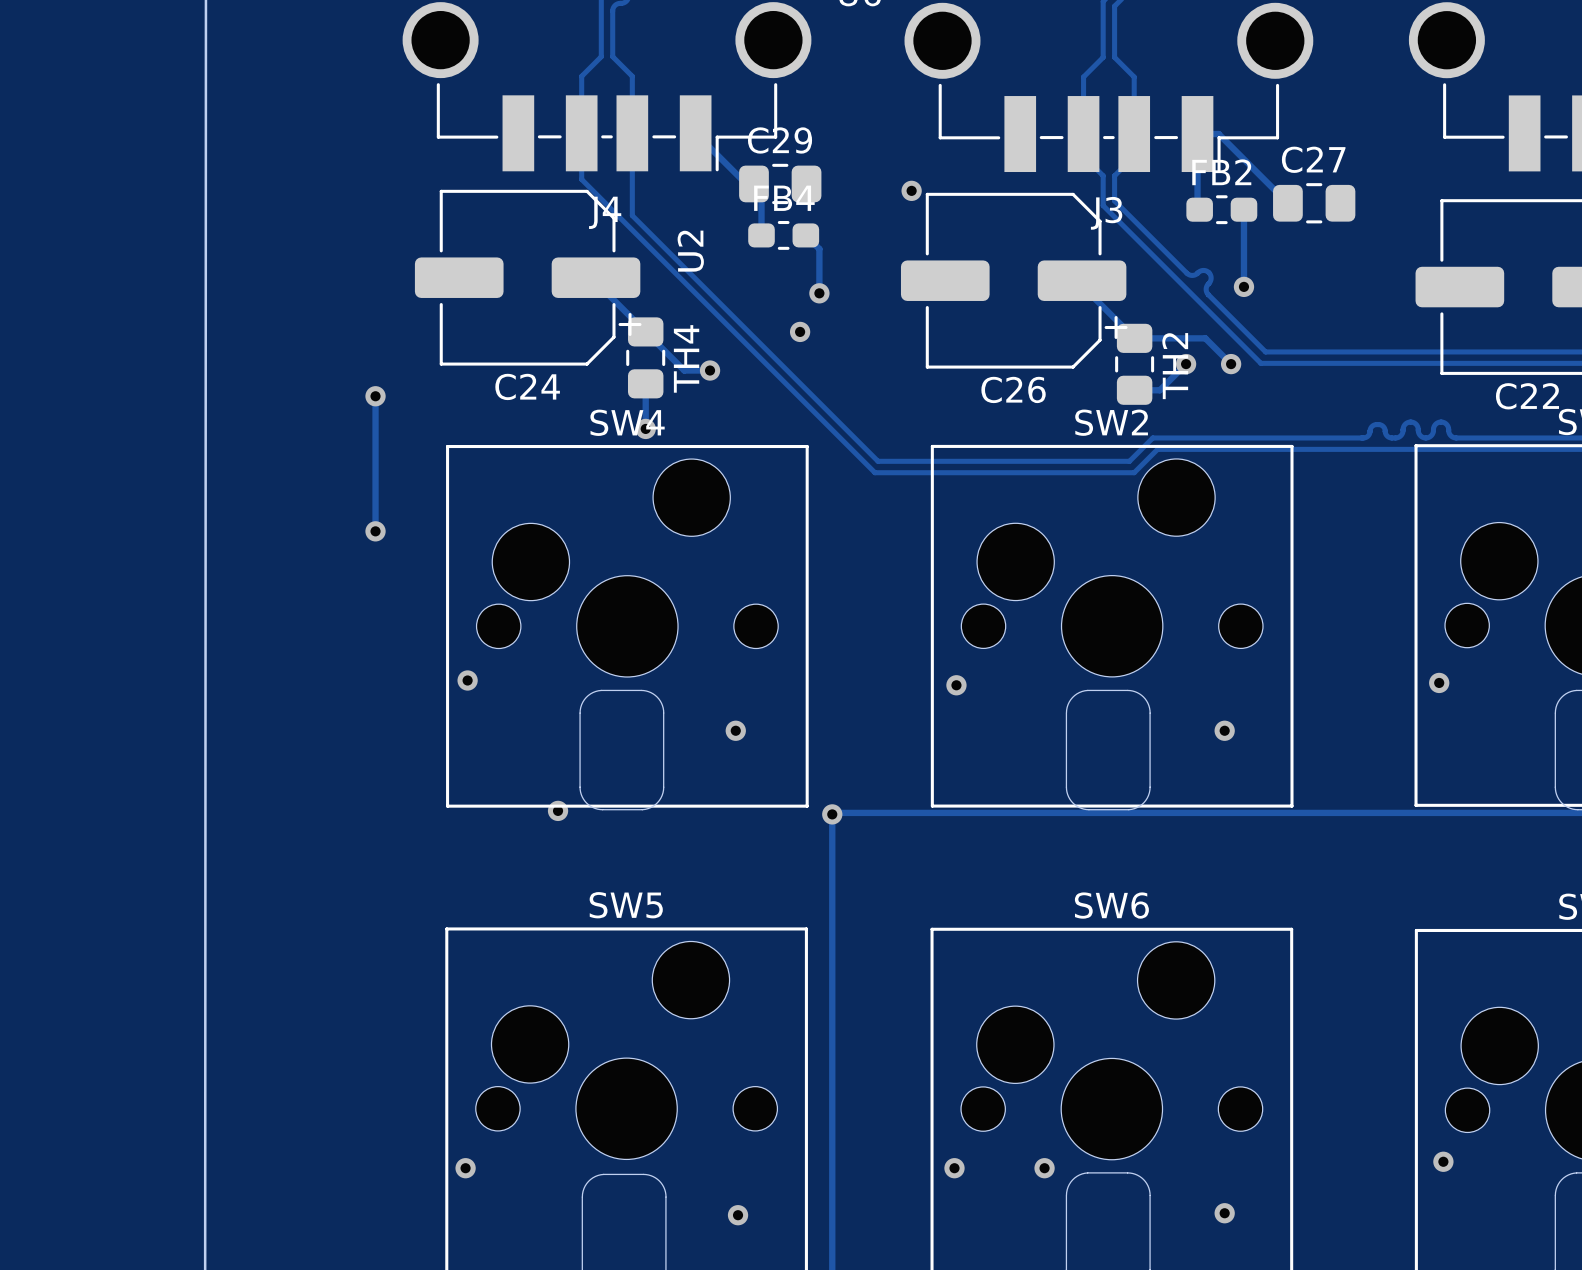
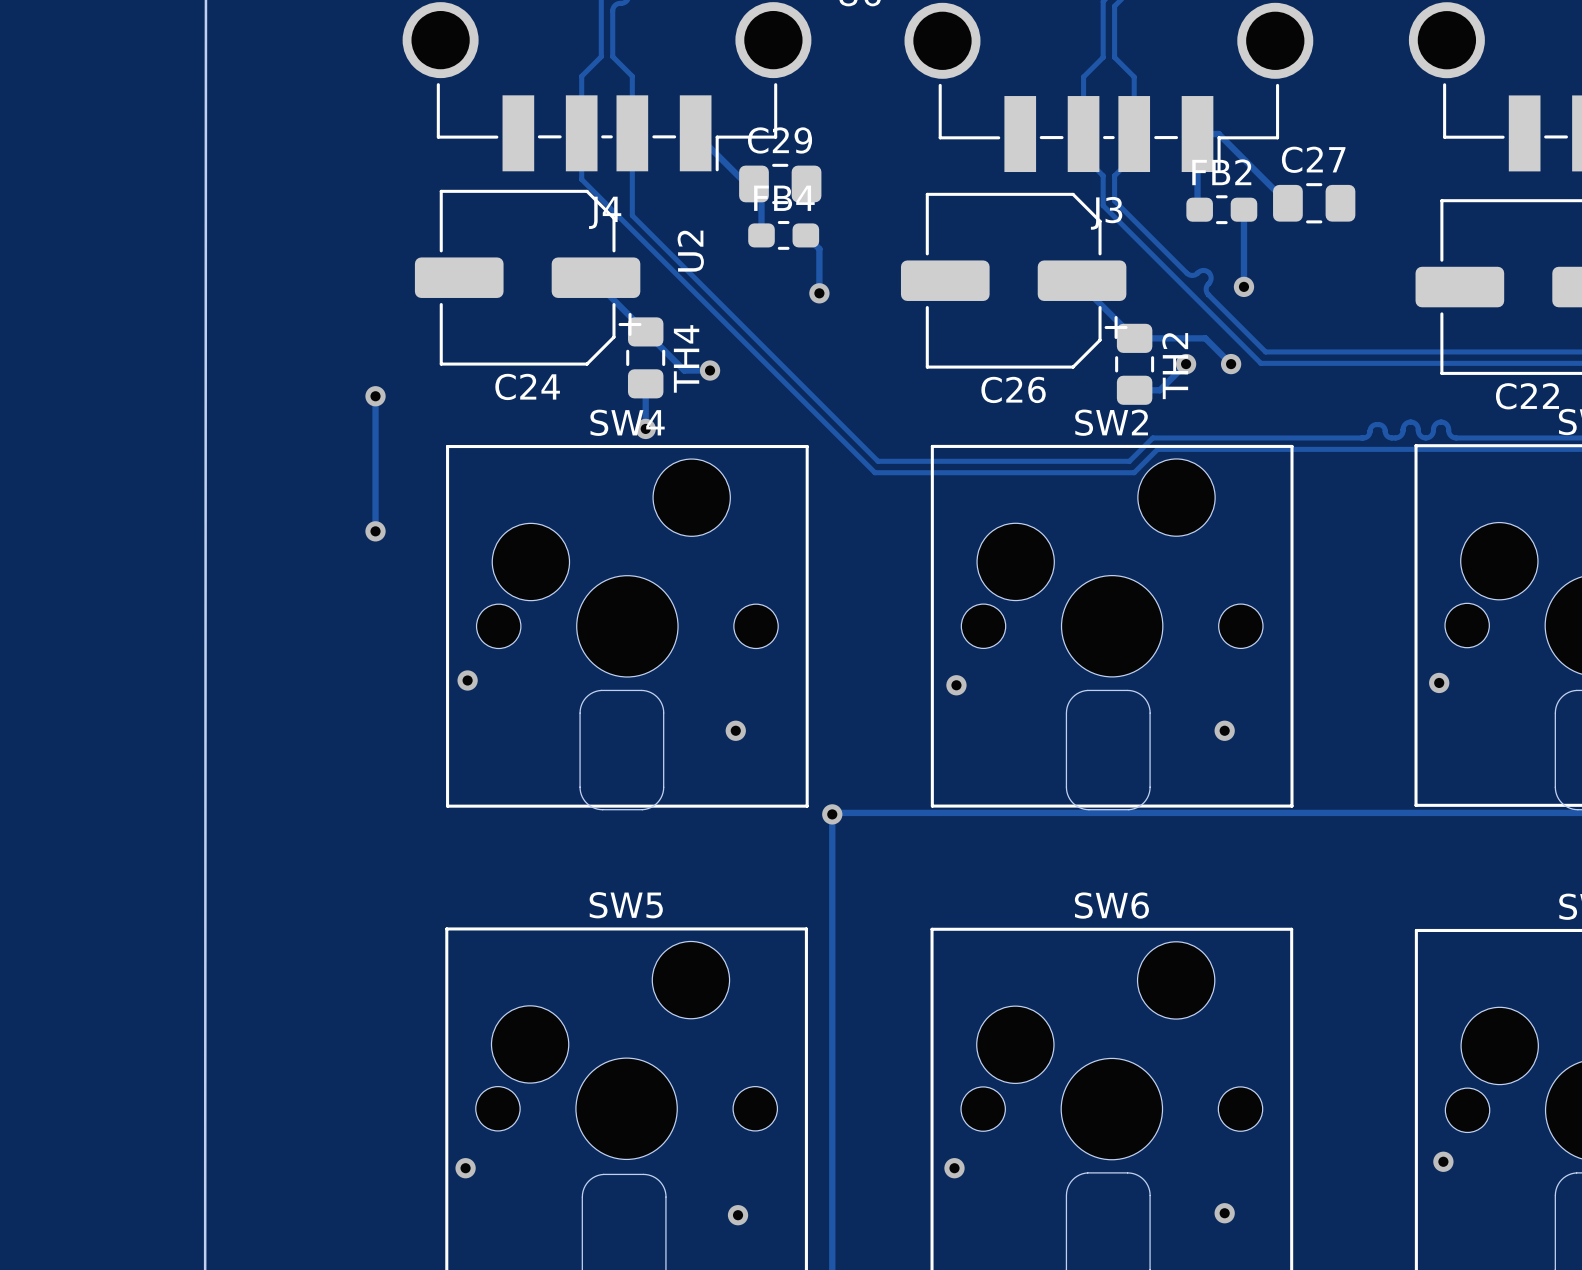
via: (911, 190) -> none
via: (800, 331) -> none
via: (558, 810) -> none
via: (1044, 1168) -> none

